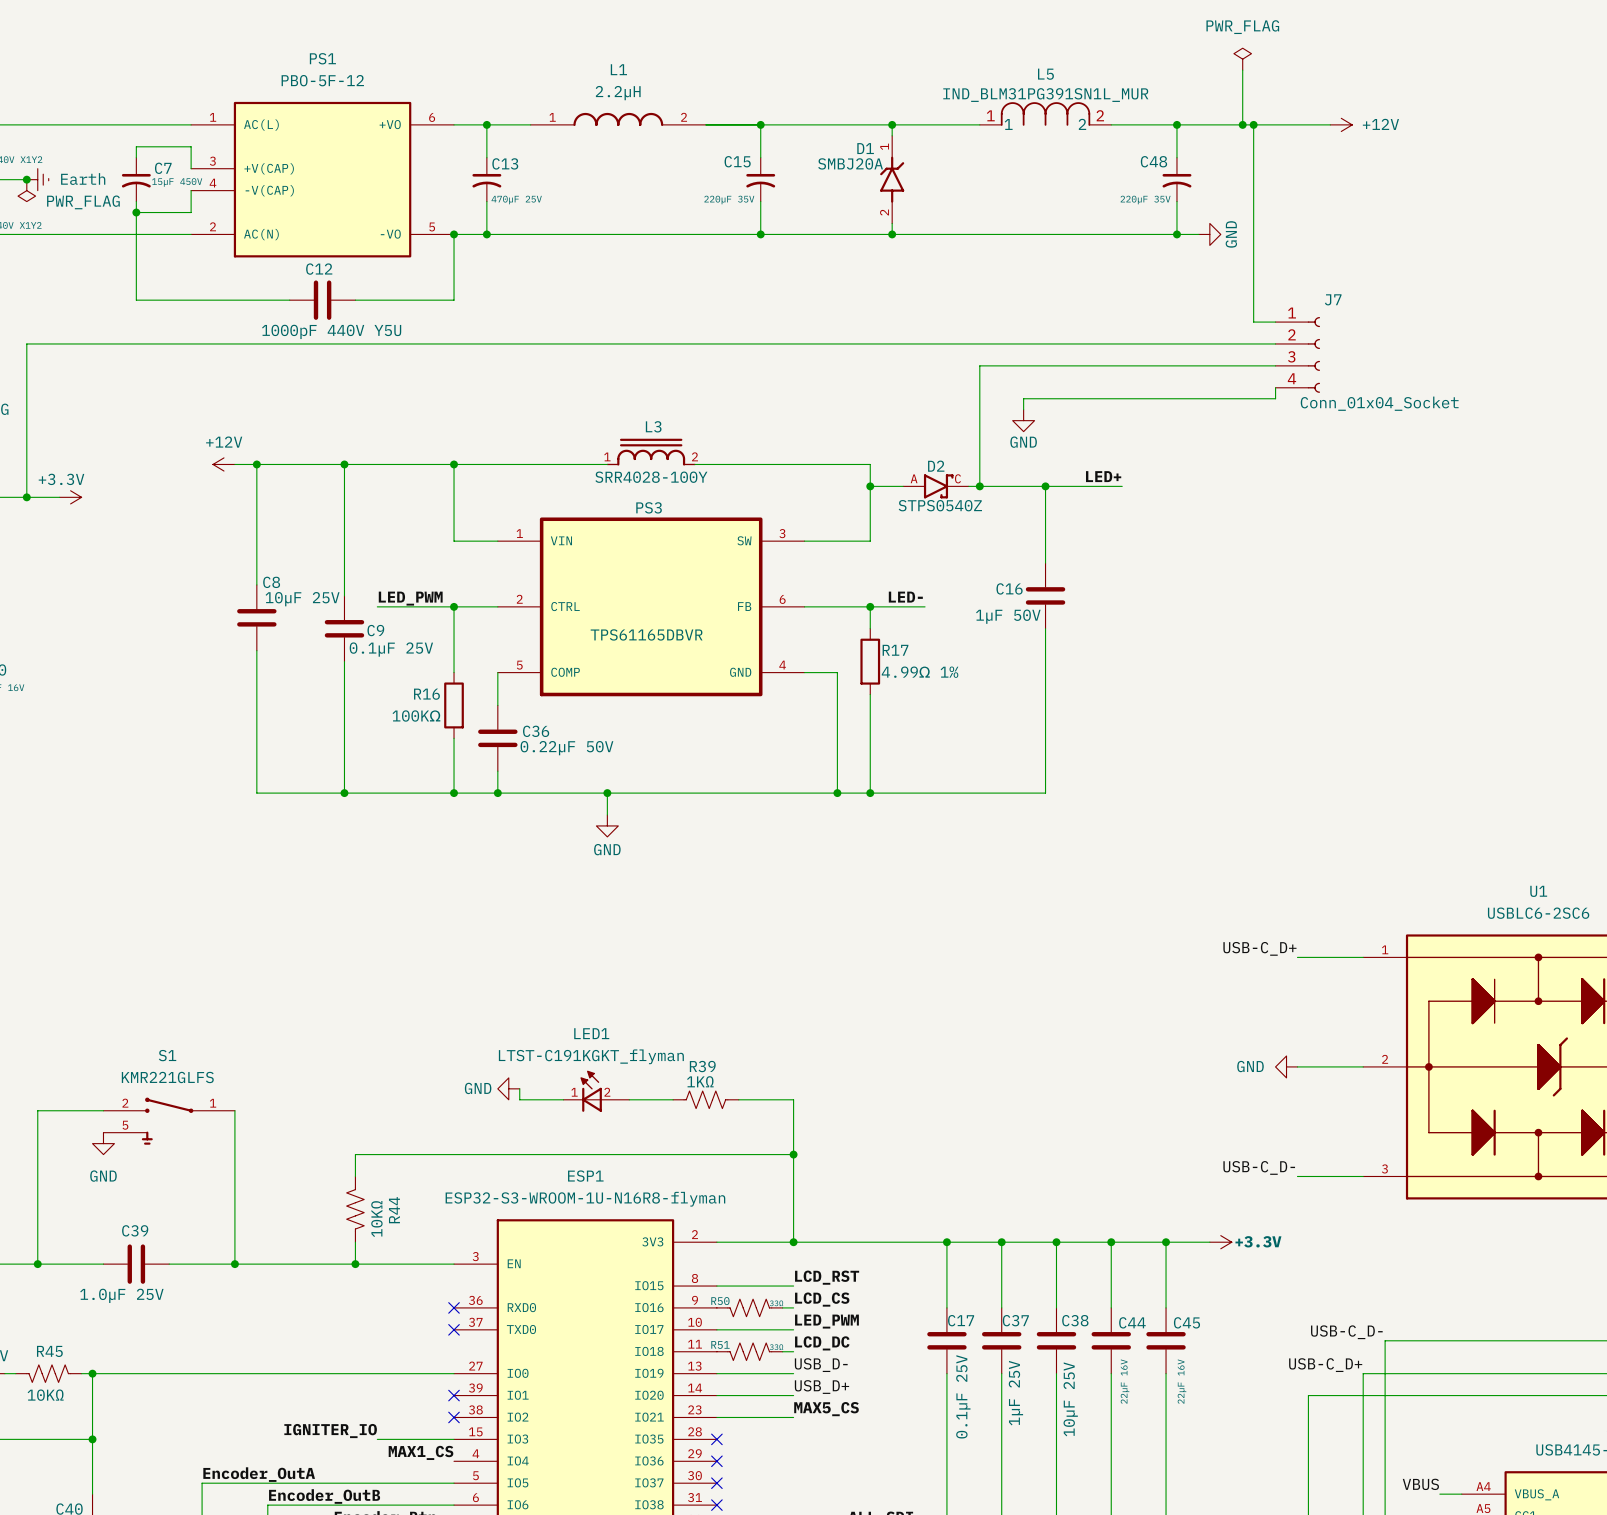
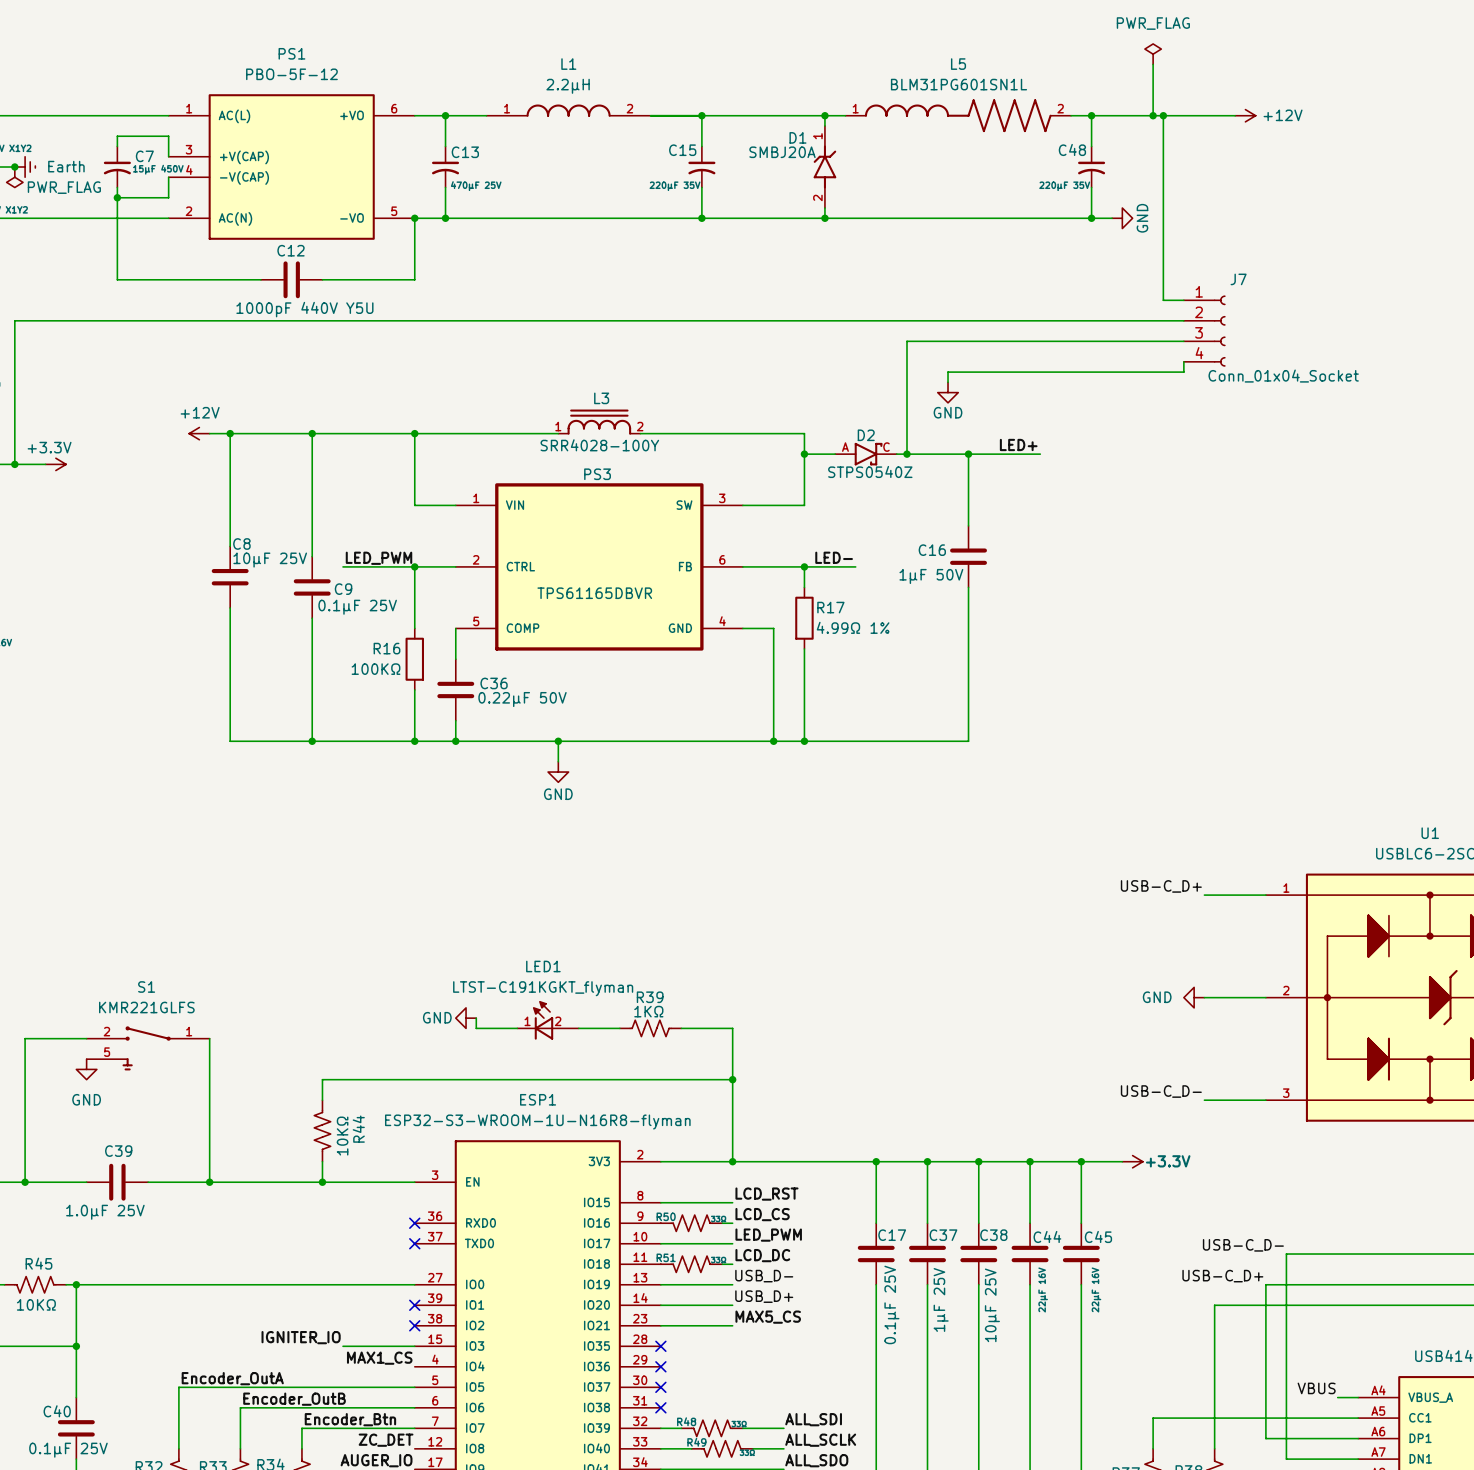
L5 value: IND_BLM31PG391SN1L_MUR (1045, 95) -> BLM31PG601SN1L (959, 84)
L5 symbol: [979, 102, 1112, 126] -> [845, 99, 1072, 133]
wire: (914, 124) (979, 124) -> none

